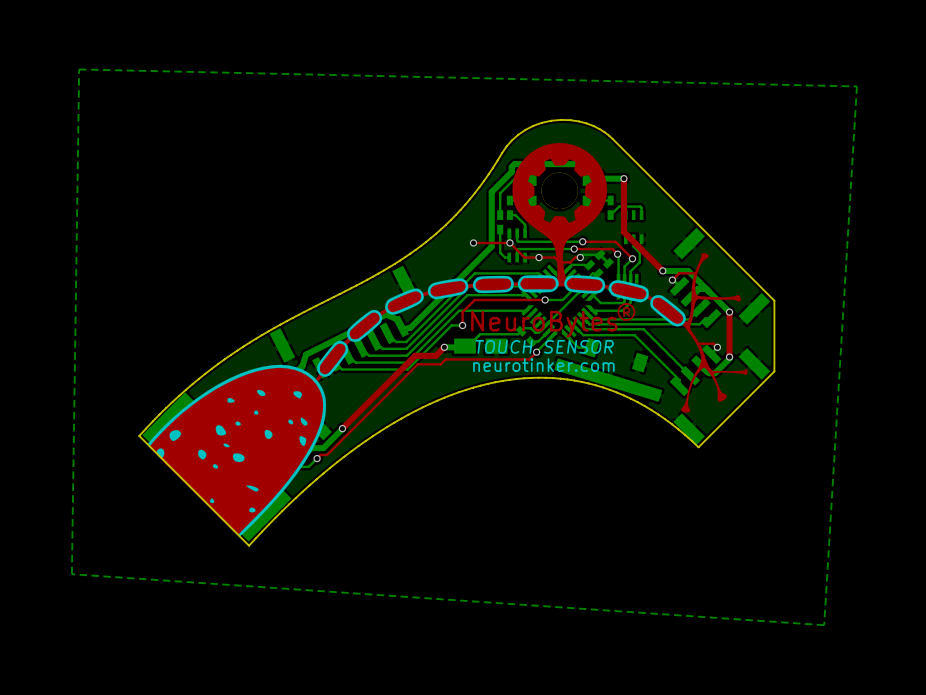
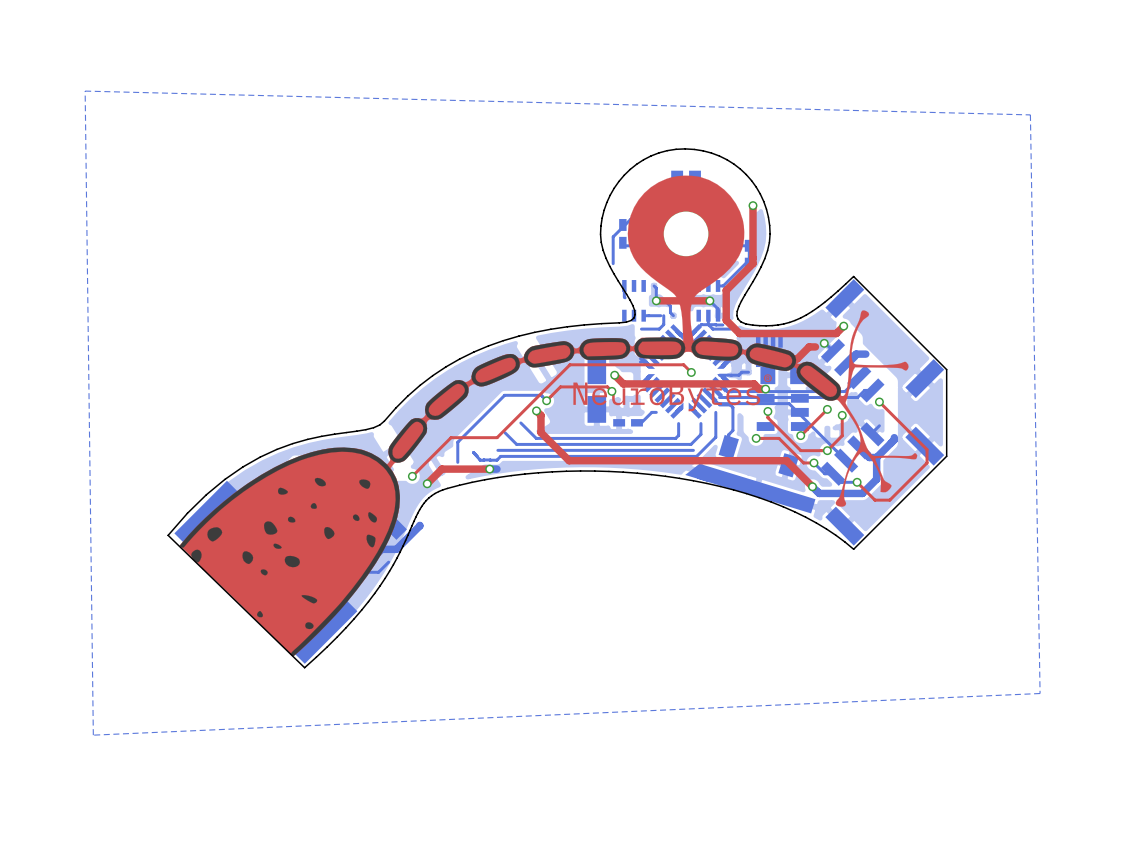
bottom zone outline: (79, 69) (856, 86) (824, 625) (71, 574) (79, 69) -> (85, 91) (93, 735) (1040, 693) (1030, 114) (85, 91)
board edge: (561, 119) (586, 123) (609, 135) (774, 300) (774, 371) (698, 447) (671, 424) (644, 406) (616, 392) (588, 383) (560, 378) (531, 377) (502, 380) (466, 389) (415, 410) (358, 446) (302, 491) (249, 545) (139, 435) (185, 389) (237, 350) (280, 324) (378, 273) (420, 246) (446, 224) (465, 204) (512, 140) (533, 125) (561, 119) -> (685, 148) (658, 152) (636, 164) (618, 181) (604, 210) (600, 234) (603, 250) (609, 266) (632, 305) (635, 314) (631, 320) (567, 326) (534, 332) (503, 340) (473, 352) (446, 366) (419, 385) (379, 424) (365, 429) (321, 436) (292, 443) (260, 457) (242, 466) (206, 494) (168, 535) (304, 667) (346, 627) (374, 593) (393, 564) (417, 513) (426, 500) (442, 489) (471, 482) (524, 474) (580, 470) (637, 473) (693, 480) (746, 493) (783, 506) (826, 529) (853, 549) (946, 456) (946, 369) (853, 276) (818, 307) (795, 320) (766, 325) (740, 321) (736, 315) (738, 306) (761, 266) (767, 250) (770, 233) (766, 209) (760, 194) (751, 180) (733, 164) (711, 153) (685, 148)
drawing shape: [147, 142, 748, 537] -> [179, 175, 918, 657]
part: none -> (686, 174)
top track: none -> (753, 205) (753, 263) (726, 290) (726, 320) (739, 333) (836, 333) (843, 326)
top track: (623, 178) (623, 232) (662, 270) -> none
bottom track: (623, 178) (596, 178) (582, 164) (514, 164) (511, 167) (511, 171) (491, 192) (491, 246) (410, 327) (403, 329) (397, 319) (386, 314) (306, 354) (302, 366) (280, 388) (291, 400) (300, 394) (303, 394) (316, 407) (316, 410) (310, 416) -> none
via position: (623, 178) -> (753, 205)
part: none -> (622, 233)
bottom track: none -> (749, 242) (749, 259) (723, 285) (718, 285)
part: (509, 207) -> none
bottom track: (509, 215) (515, 215) (525, 224) (525, 233) -> none
bottom track: (610, 215) (619, 206) (640, 206) (641, 215) -> none
part: (500, 222) -> none
part position: (633, 227) -> (708, 300)
bottom track: (500, 229) (500, 252) (505, 257) (509, 257) -> none
bottom track: (517, 233) (518, 241) (582, 241) -> none
bottom track: none -> (654, 285) (656, 288) (656, 300) (665, 300) (670, 306) (670, 312) (673, 315)
bottom track: (633, 239) (633, 246) (639, 252) (639, 262) (630, 271) (630, 278) -> none
top track: (582, 241) (615, 241) (632, 258) -> none
via: (582, 241) -> none
top track: (473, 242) (509, 242) (524, 257) (554, 257) (559, 262) (570, 262) (575, 257) (580, 257) -> none
via: (473, 242) -> none
via: (509, 242) -> none
top track: none -> (656, 300) (709, 300)
bottom track: none -> (709, 300) (718, 309) (718, 315)
via: none -> (709, 300)
top track: (574, 249) (612, 249) (617, 254) -> none
bottom track: (574, 249) (518, 249) (517, 257) -> none
via: (574, 249) -> none
bottom track: (617, 254) (618, 278) -> none
via: (617, 254) -> none
via position: (539, 257) -> (656, 300)
bottom track: none -> (663, 315) (663, 324) (659, 329) (641, 329)
bottom track: none -> (708, 315) (708, 324) (712, 329) (730, 329)
bottom track: (580, 257) (583, 254) (600, 254) (608, 263) -> none
via: (580, 257) -> none
bottom track: (632, 258) (624, 266) (624, 278) -> none
via: (632, 258) -> none
part: (594, 259) -> none
part: (603, 268) -> none
bottom track: (662, 270) (688, 270) (729, 312) -> none
via position: (662, 270) -> (843, 326)
bottom track: (598, 273) (592, 273) (588, 277) (584, 277) (562, 300) (545, 300) -> none
top track: (695, 273) (679, 273) (672, 280) -> none
drawing: none -> [179, 337, 841, 657]
bottom track: (544, 279) (538, 273) (474, 273) (406, 341) (396, 341) (387, 333) -> none
top track: none -> (815, 346) (809, 346) (797, 358) (787, 358)
bottom track: (583, 288) (538, 332) (535, 332) (530, 328) (524, 328) (518, 334) (480, 334) (468, 346) (444, 347) -> none
bottom track: (531, 292) (525, 286) (469, 286) (406, 348) (382, 348) (374, 340) -> none
bottom track: (624, 294) (623, 303) (600, 303) (593, 295) -> none
bottom track: (630, 294) (630, 302) (622, 310) (593, 310) -> none
bottom track: (522, 295) (467, 295) (406, 355) (369, 355) (360, 347) -> none
top track: (545, 300) (474, 300) (462, 312) (462, 325) -> none
via position: (545, 300) -> (691, 372)
top track: none -> (691, 372) (683, 364) (569, 364) (497, 437) (451, 437) (412, 476)
bottom track: none -> (748, 372) (741, 372) (738, 375) (719, 375)
top track: none -> (614, 375) (623, 383) (754, 383) (759, 389) (765, 389)
via: none -> (614, 375)
part: none -> (782, 375)
bottom track: (526, 310) (459, 310) (407, 362) (355, 362) (347, 354) -> none
top track: (729, 312) (729, 357) -> none
via: (729, 312) -> none
via: none -> (765, 389)
top track: none -> (611, 391) (607, 386) (560, 386) (546, 400)
via: none -> (611, 391)
part: (343, 322) -> none
bottom track: (462, 325) (451, 325) (407, 369) (342, 369) (333, 360) -> none
via: (462, 325) -> none
bottom track: none -> (546, 400) (541, 395) (504, 395) (457, 442) (457, 462)
via: none -> (546, 400)
bottom track: (574, 326) (583, 335) (634, 335) (679, 380) (679, 386) -> none
top track: none -> (879, 401) (927, 449) (927, 462) (889, 500) (874, 500) (857, 482)
via: none -> (879, 401)
bottom track: (548, 330) (538, 341) (531, 341) -> none
bottom track: none -> (719, 404) (730, 404) (732, 407) (732, 430) (728, 434) (728, 447)
top track: none -> (827, 409) (800, 435)
via: none -> (827, 409)
top track: none -> (536, 410) (540, 415) (540, 432) (569, 460) (786, 460) (812, 486)
via: none -> (536, 410)
top track: none -> (767, 411) (767, 417) (800, 450) (827, 450) (842, 435) (842, 415)
via: none -> (767, 411)
part: (526, 336) -> none
bottom track: none -> (656, 412) (651, 412) (641, 422) (636, 422)
bottom track: (567, 336) (578, 347) (591, 347) -> none
bottom track: none -> (715, 412) (715, 437) (696, 456) (500, 456) (496, 460) (483, 460)
part: none -> (782, 412)
bottom track: (551, 337) (536, 352) -> none
via: none -> (842, 415)
top track: (699, 343) (713, 343) (717, 347) -> none
part: none -> (628, 422)
bottom track: none -> (520, 422) (536, 438) (675, 438) (678, 435) (678, 423)
bottom track: none -> (700, 423) (700, 434) (690, 444) (516, 444) (505, 432)
part rotation: 0° (480, 346) -> 90° clockwise (596, 390)
text: TOUCH SENSOR (544, 346) -> none
top track: (444, 347) (435, 355) (415, 355) (342, 428) -> none
via: (444, 347) -> none
via: (717, 347) -> none
top track: (536, 352) (529, 359) (445, 359) (440, 364) (417, 364) (327, 454) (320, 454) (317, 458) -> none
via: (536, 352) -> none
via: none -> (800, 435)
top track: none -> (756, 438) (779, 438) (803, 462) (813, 462)
via: none -> (756, 438)
via: (729, 357) -> none
text: neurotinker.com (543, 365) -> none
bottom track: none -> (497, 450) (693, 450)
via: none -> (827, 450)
part: (608, 369) -> none
bottom track: none -> (477, 456) (473, 452) (480, 460) (484, 460)
bottom track: none -> (876, 457) (876, 479) (862, 493) (819, 493) (812, 486)
bottom track: none -> (813, 462) (824, 473) (832, 473) (841, 482) (857, 482)
via: none -> (813, 462)
top track: none -> (489, 469) (441, 469) (427, 483)
bottom track: none -> (489, 469) (496, 469)
via: none -> (489, 469)
part: none -> (750, 474)
via: none -> (412, 476)
via: none -> (857, 482)
via: none -> (427, 483)
via: none -> (812, 486)
via: (342, 428) -> none
via: (317, 458) -> none

